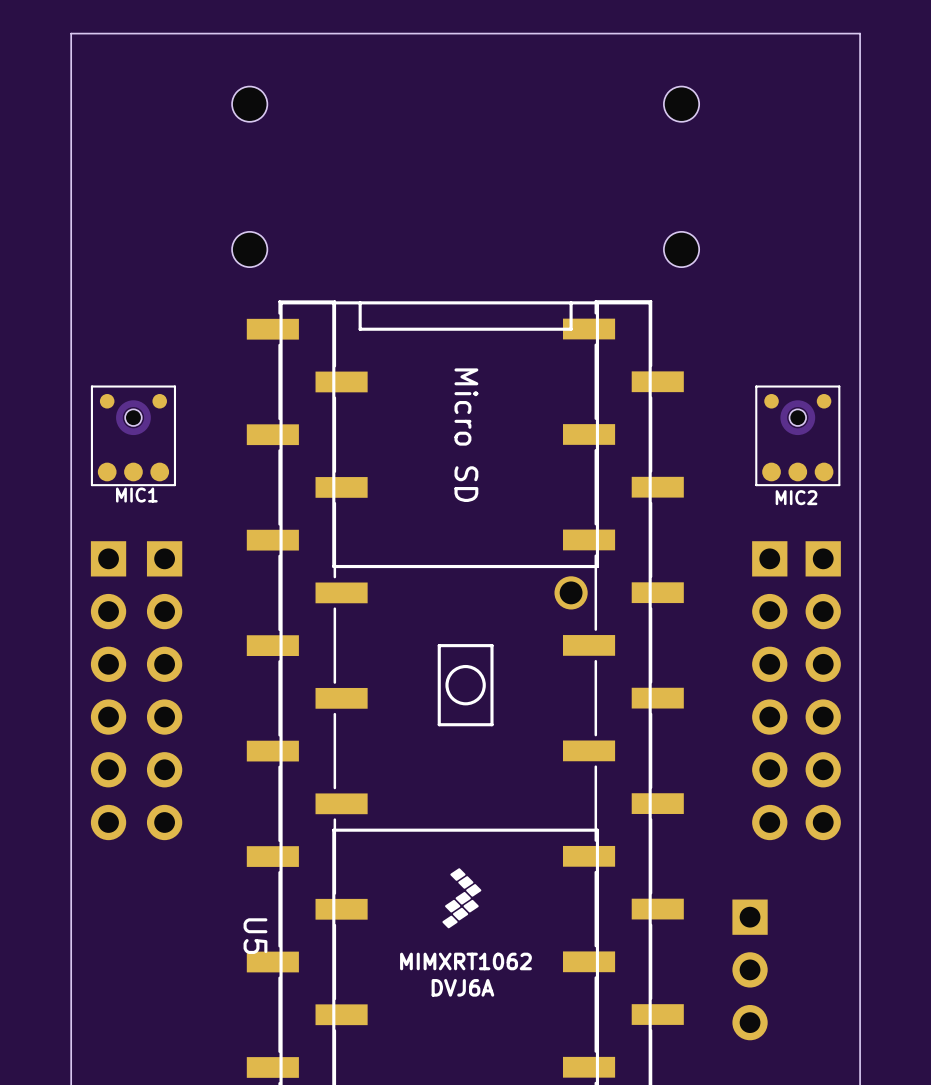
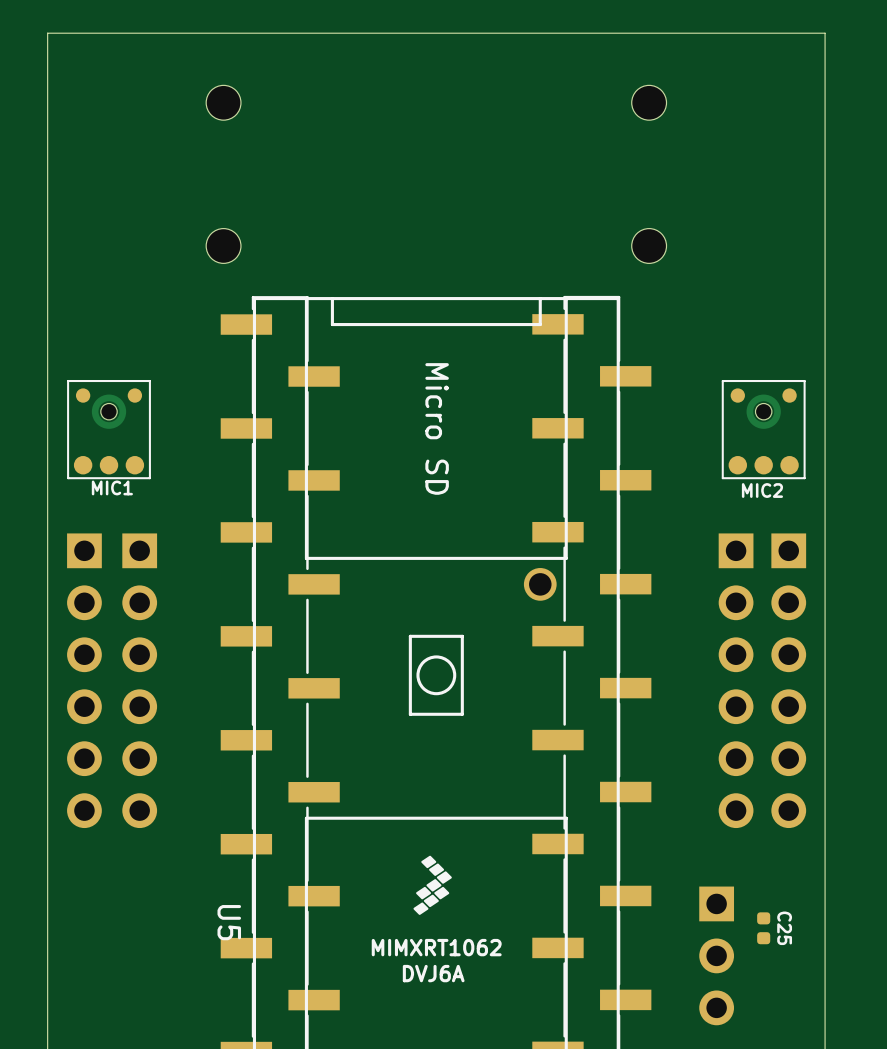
C25: none -> (763, 928)

